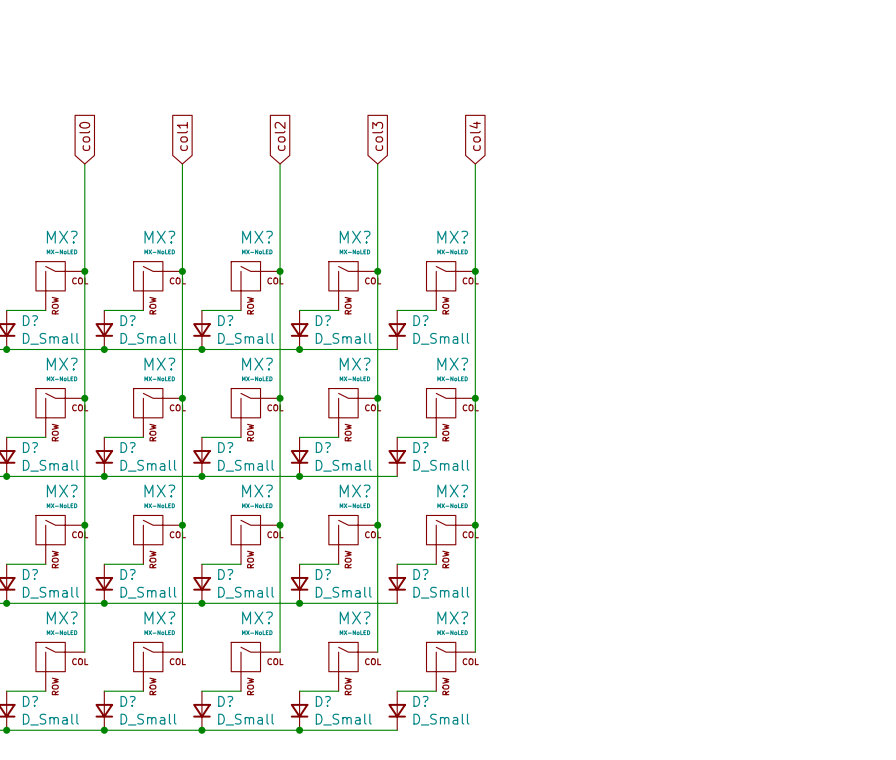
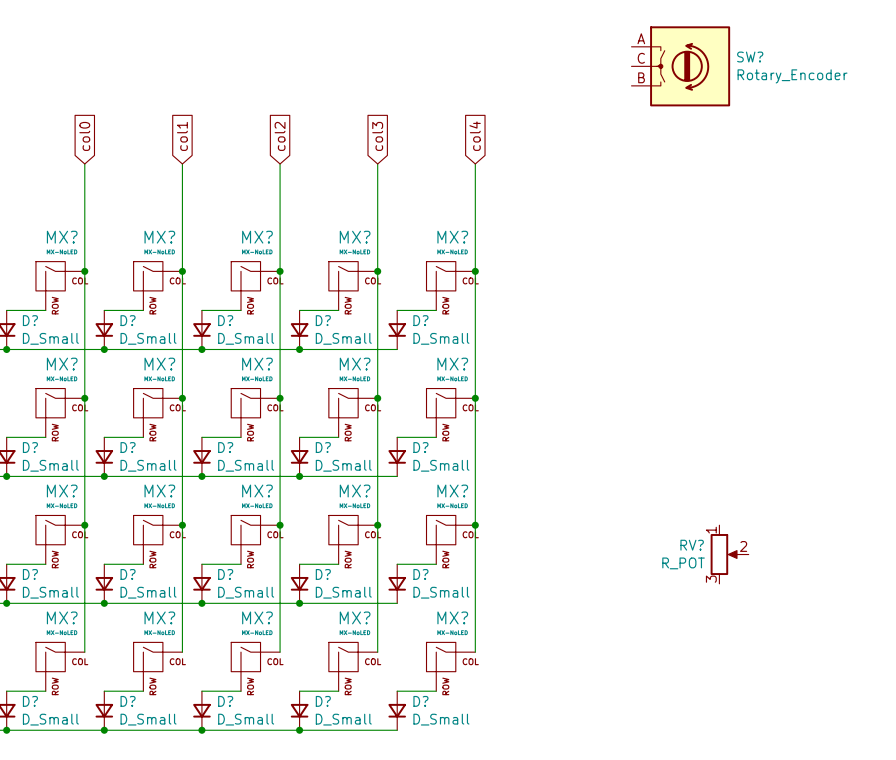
SW?: none -> Rotary_Encoder (680, 66)
RV?: none -> R_POT (729, 554)

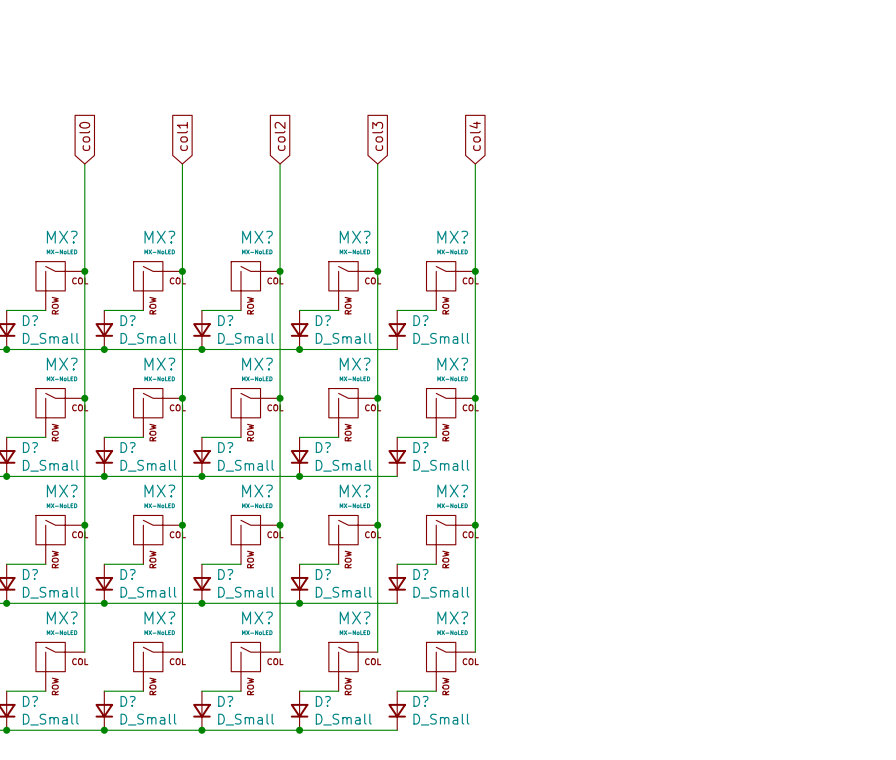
SW?: Rotary_Encoder (680, 66) -> none
RV?: R_POT (729, 554) -> none

